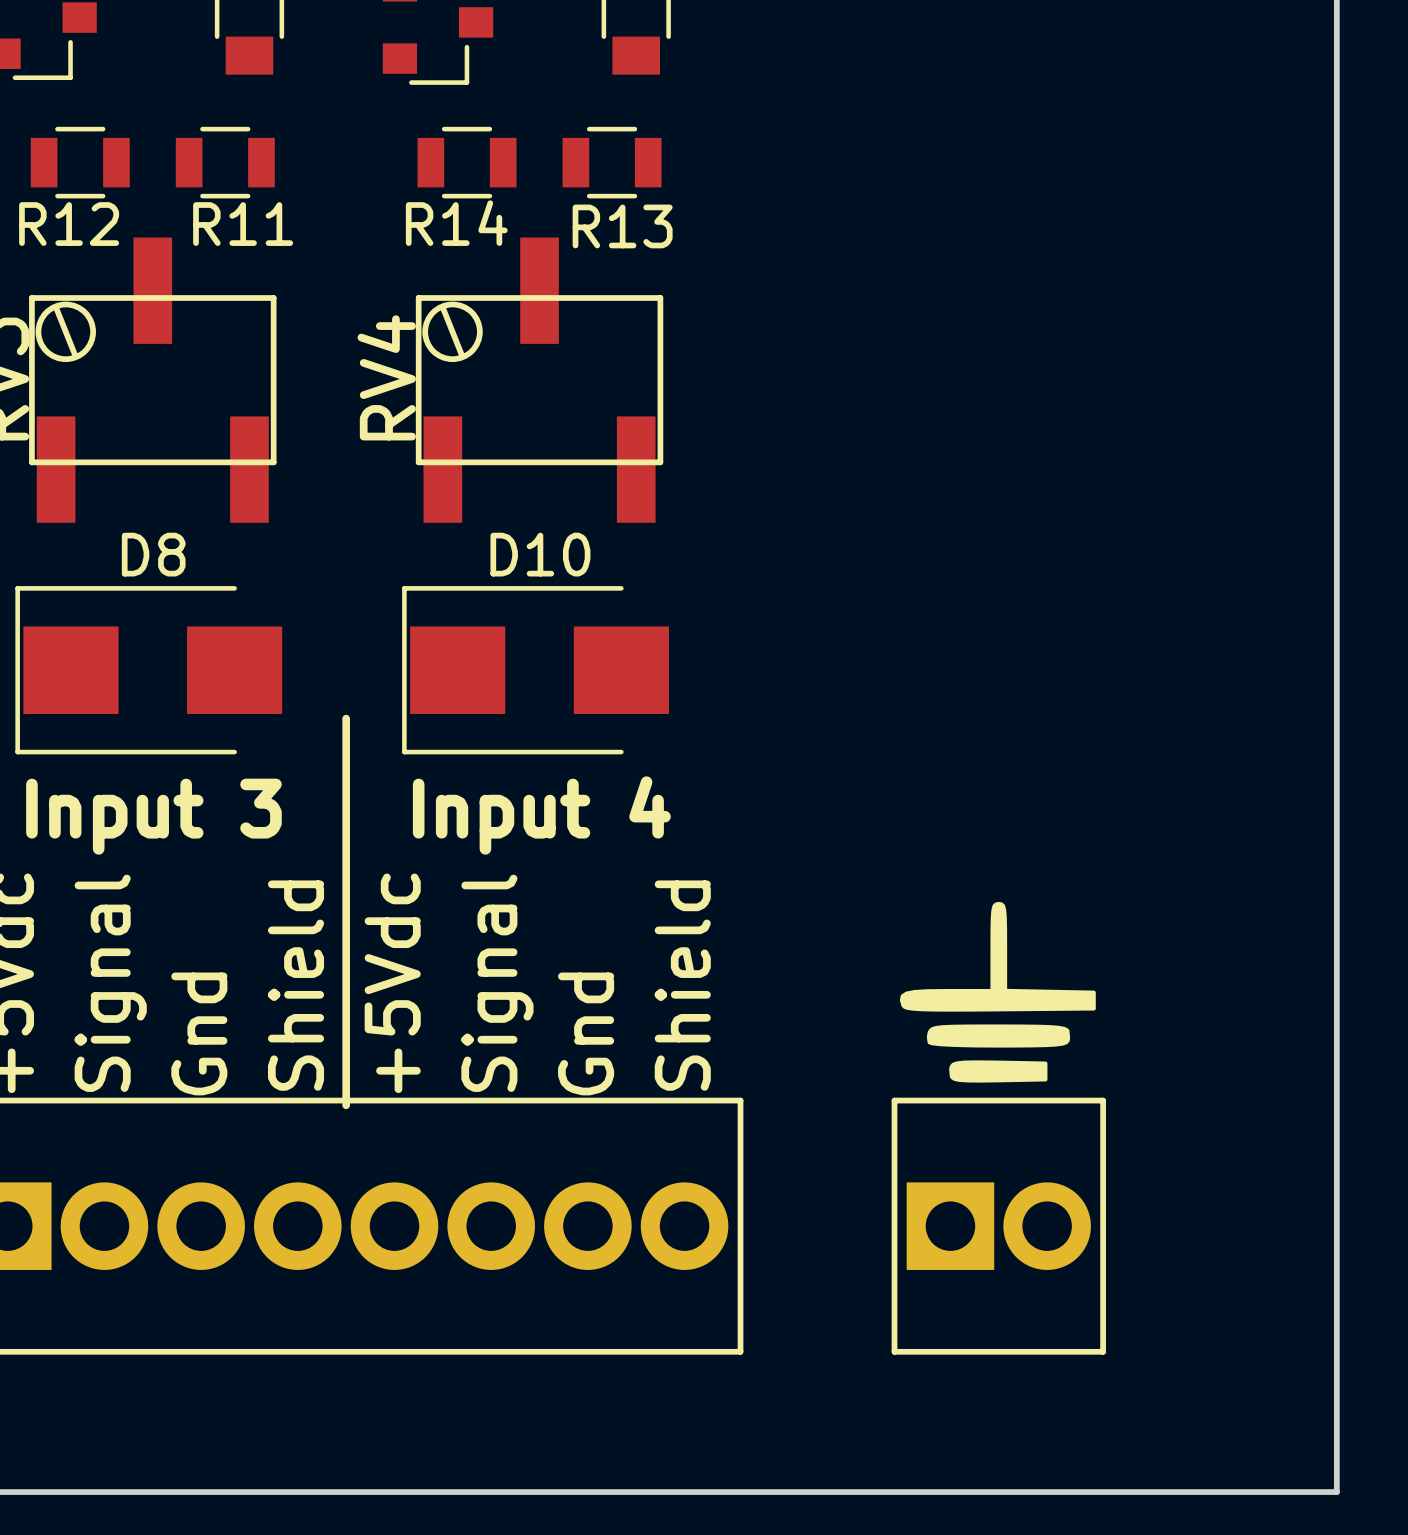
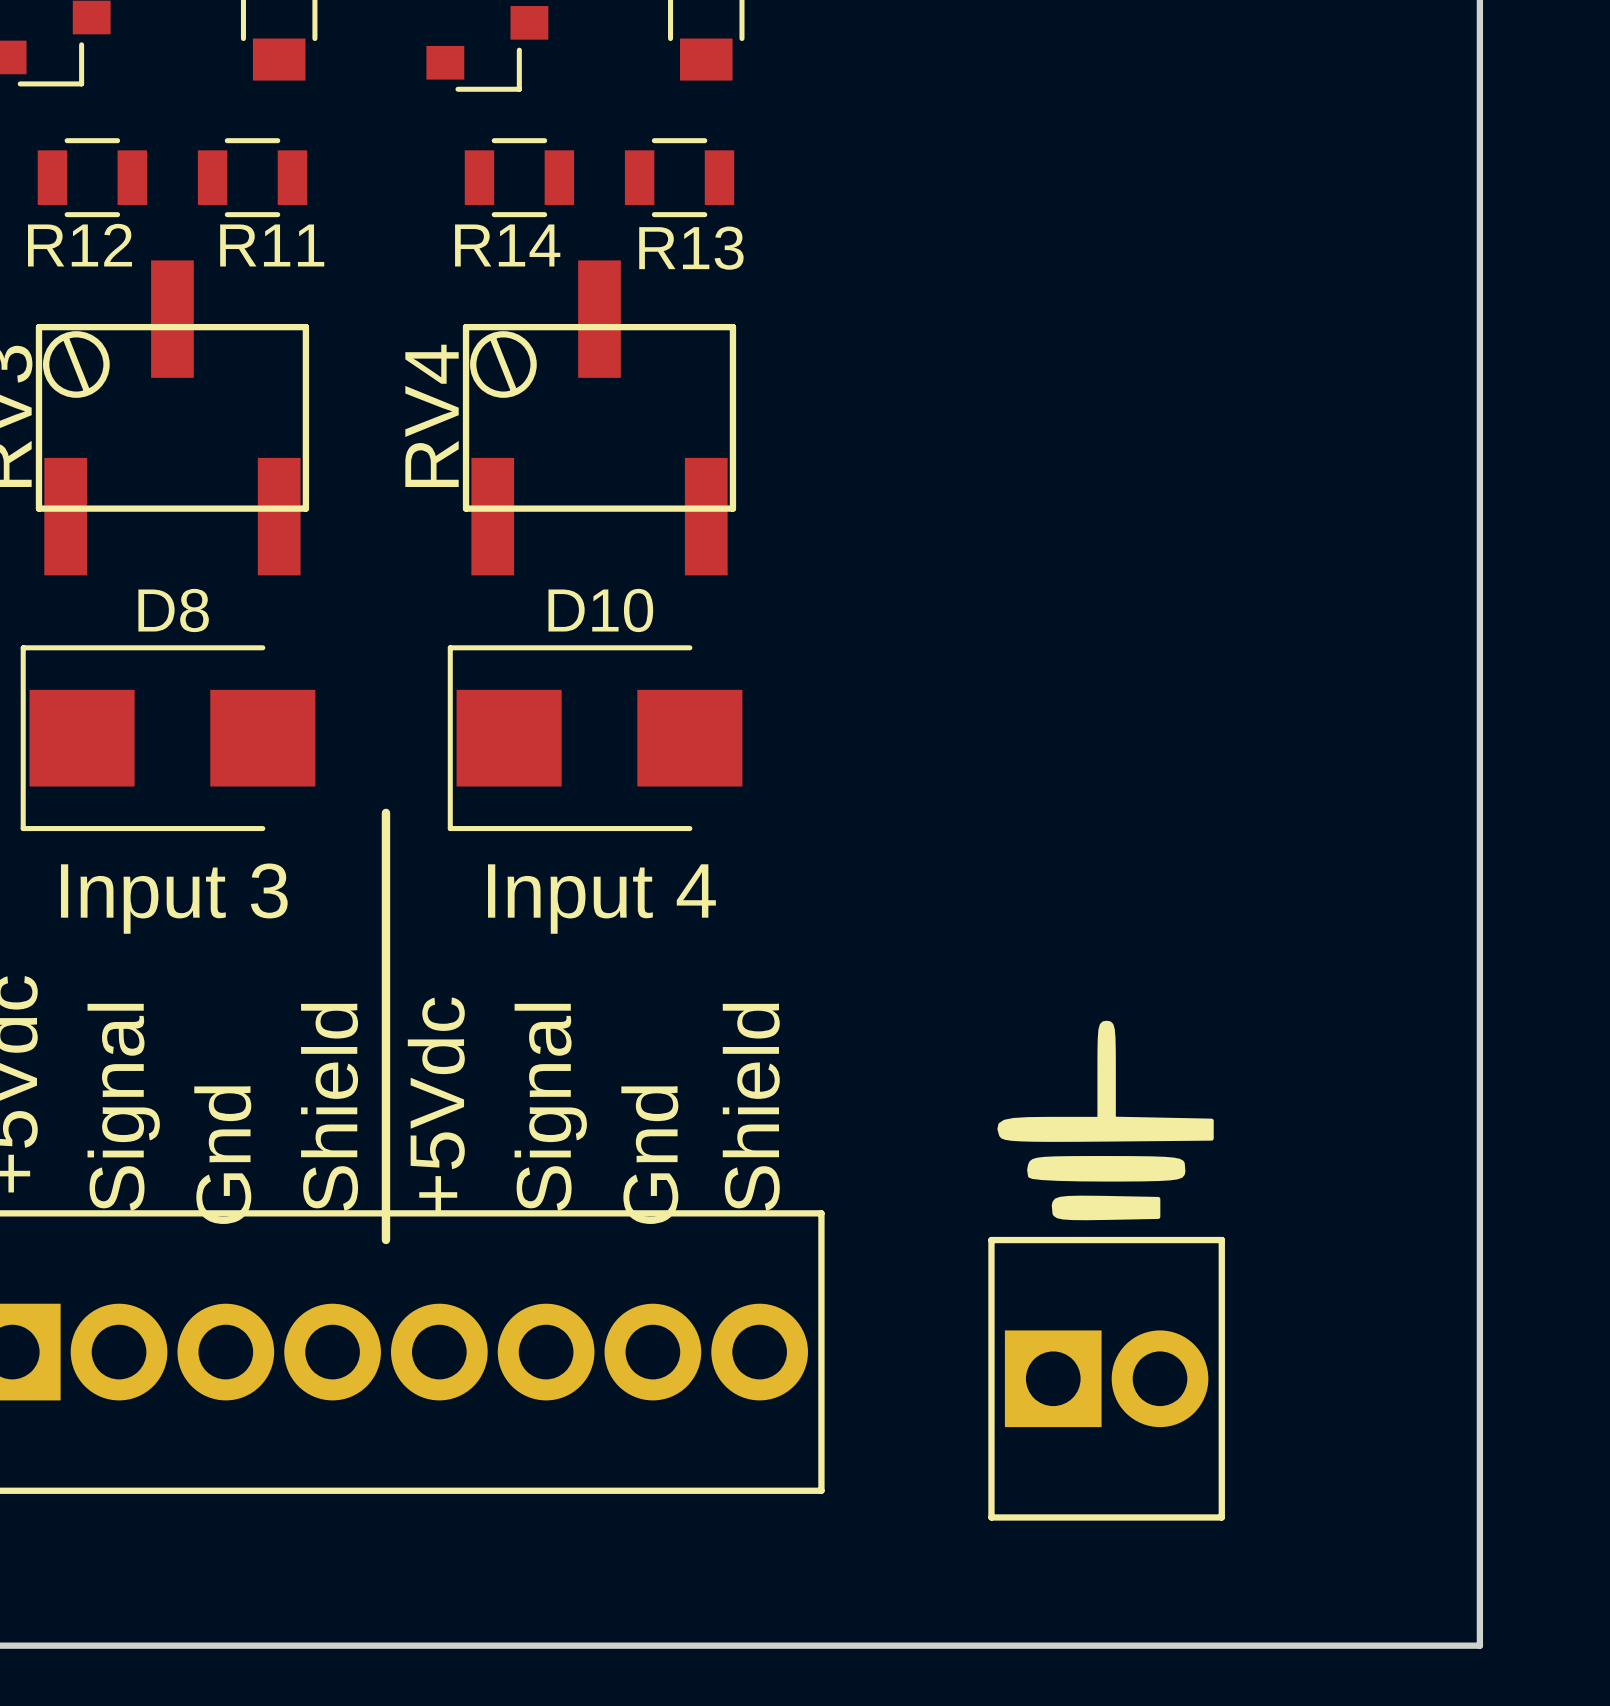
line: (346, 718) (346, 737) -> (385, 1218) (385, 1239)
text position: Signal (110, 983) -> Signal (123, 1107)
text position: +5Vdc (392, 983) -> +5Vdc (436, 1105)
text position: Signal (497, 983) -> Signal (550, 1107)
text position: Shield (296, 985) -> Shield (329, 1107)
text position: Shield (682, 985) -> Shield (751, 1107)
drawing position: (997, 992) -> (1105, 1120)
text position: Gnd (199, 1033) -> Gnd (222, 1155)
text position: Gnd (586, 1033) -> Gnd (649, 1155)
part position: (998, 1226) -> (1106, 1378)

